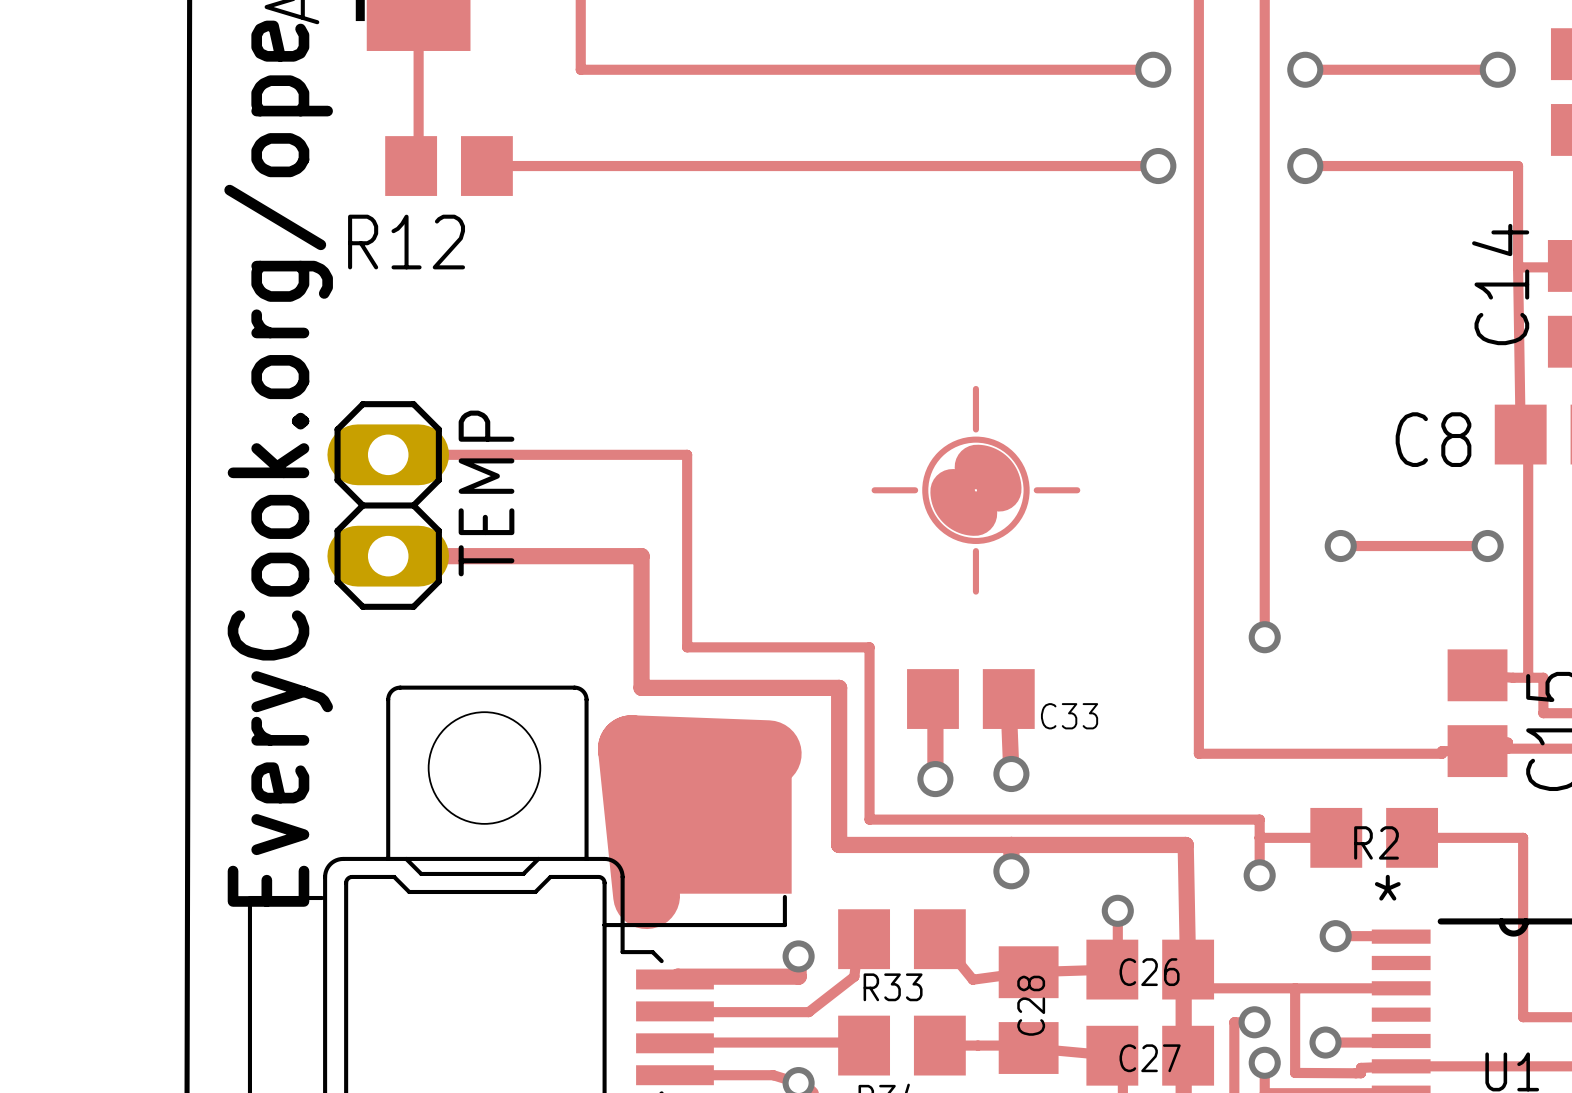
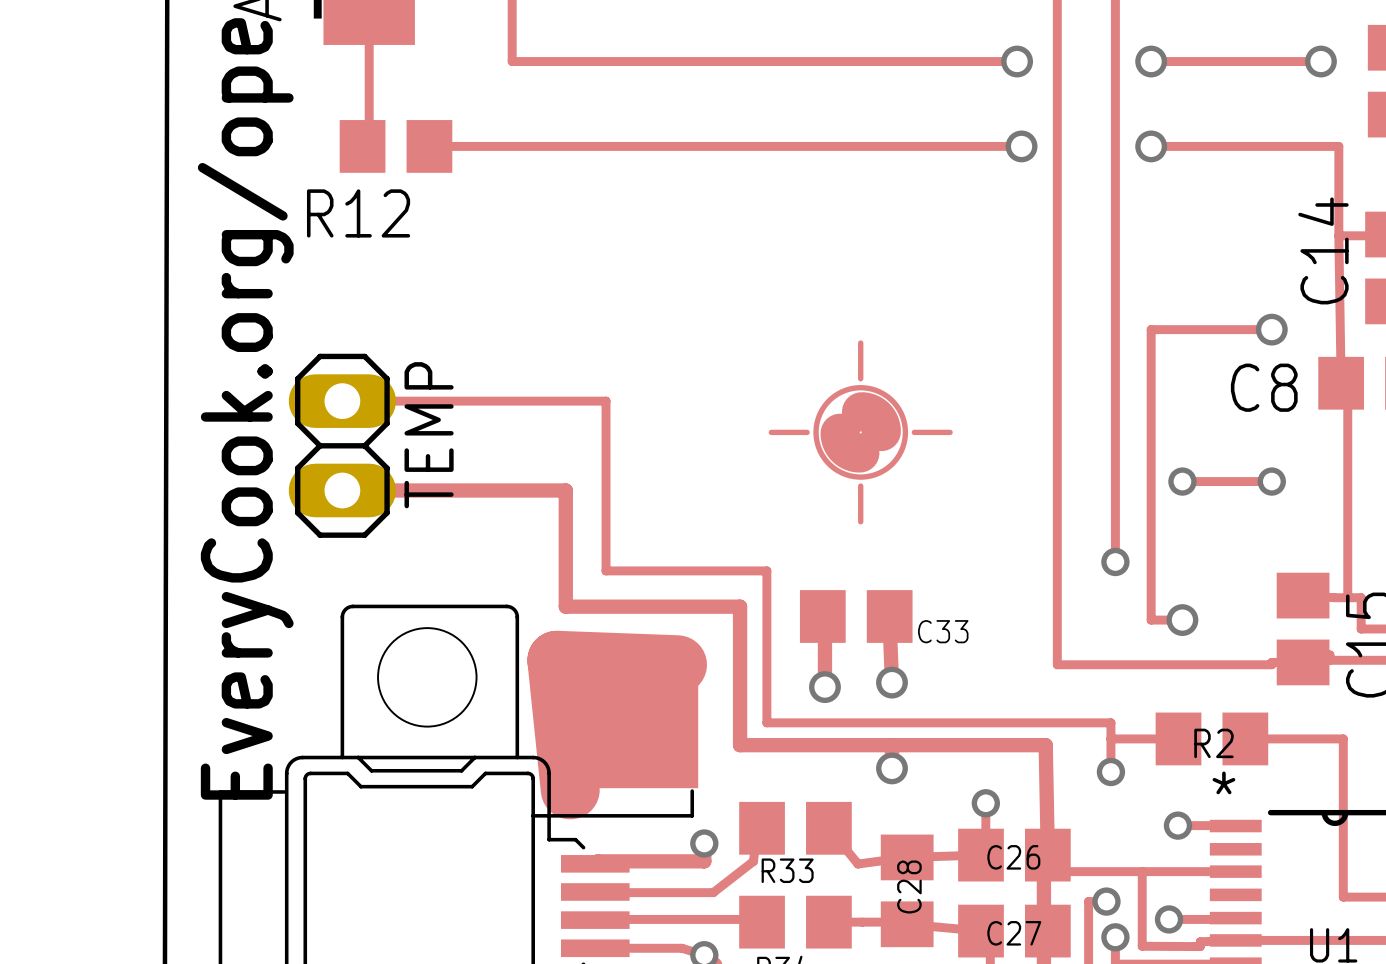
track: none -> (1271, 329) (1151, 329) (1151, 620) (1182, 620)
via: none -> (1271, 329)
track: (1442, 546) (1487, 546) -> none
via position: (1487, 546) -> (1271, 481)
via: none -> (1182, 620)

